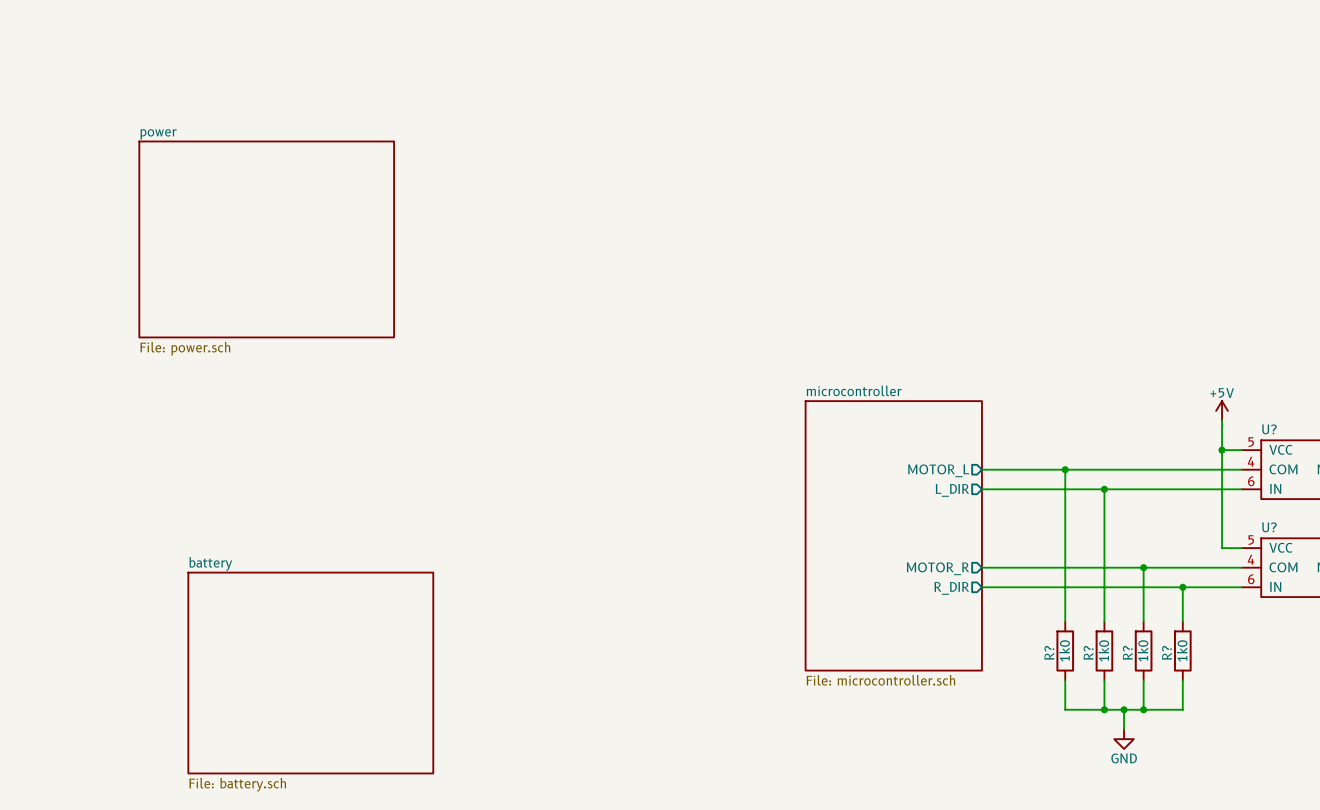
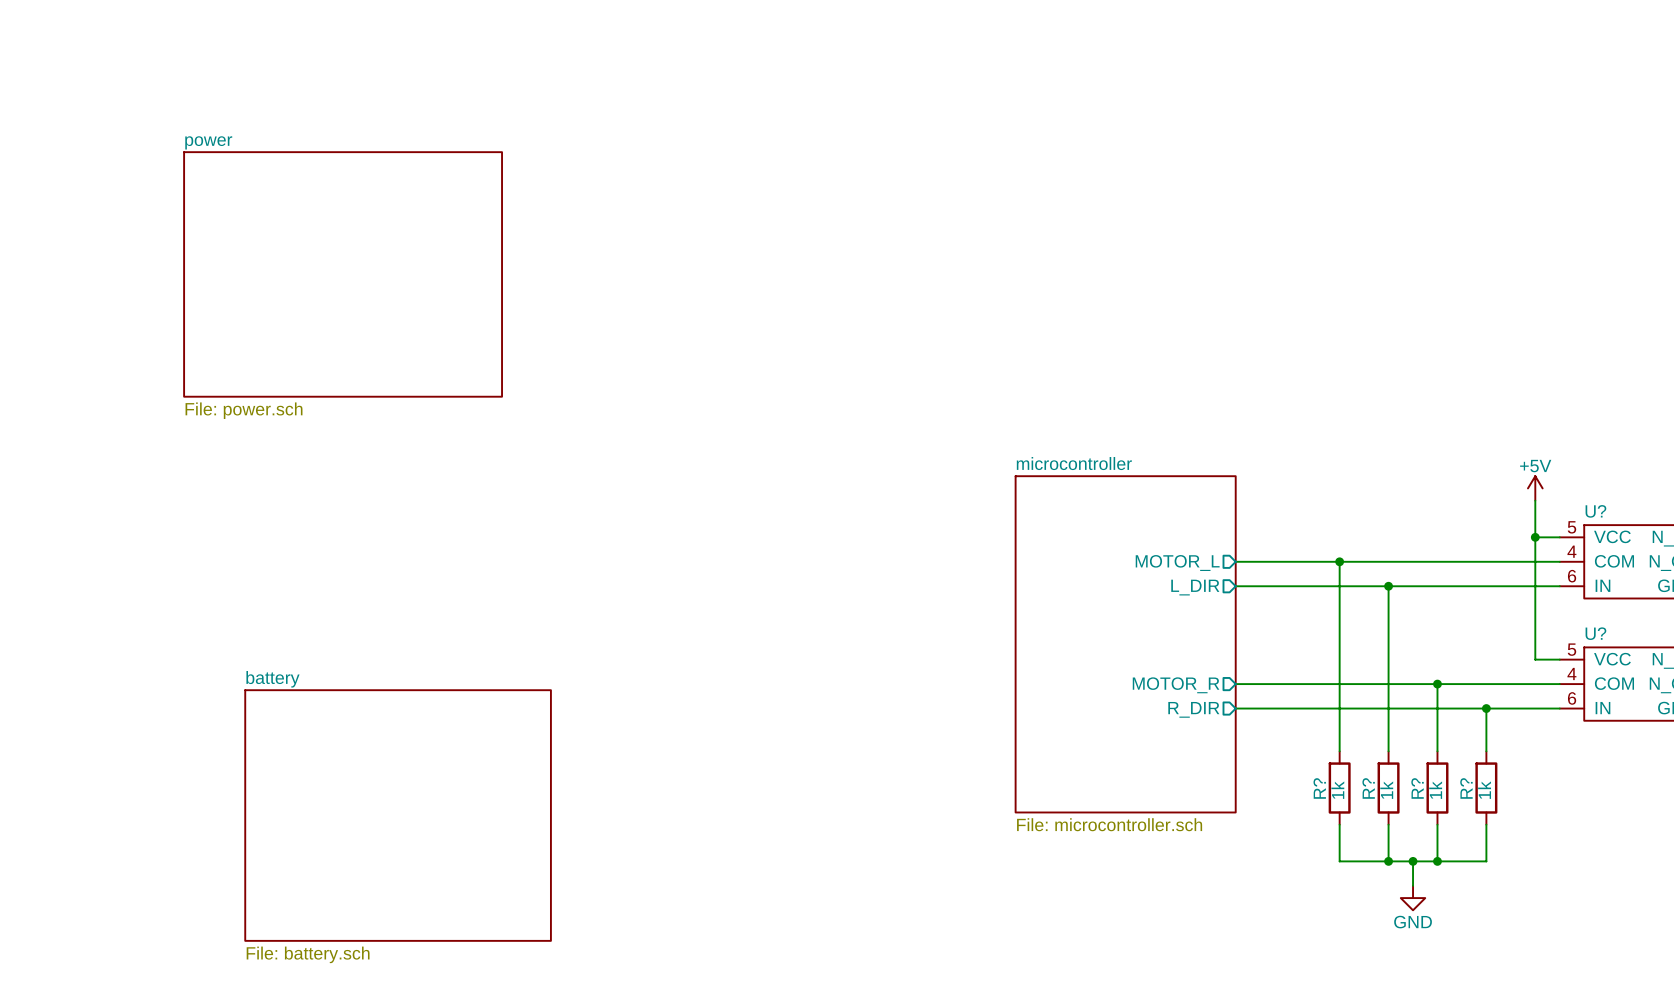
R? text: 1k0 (1064, 650) -> 1k (1337, 790)
R? text: 1k0 (1103, 650) -> 1k (1386, 790)
R? text: 1k0 (1142, 650) -> 1k (1435, 790)
R? text: 1k0 (1182, 650) -> 1k (1484, 790)

